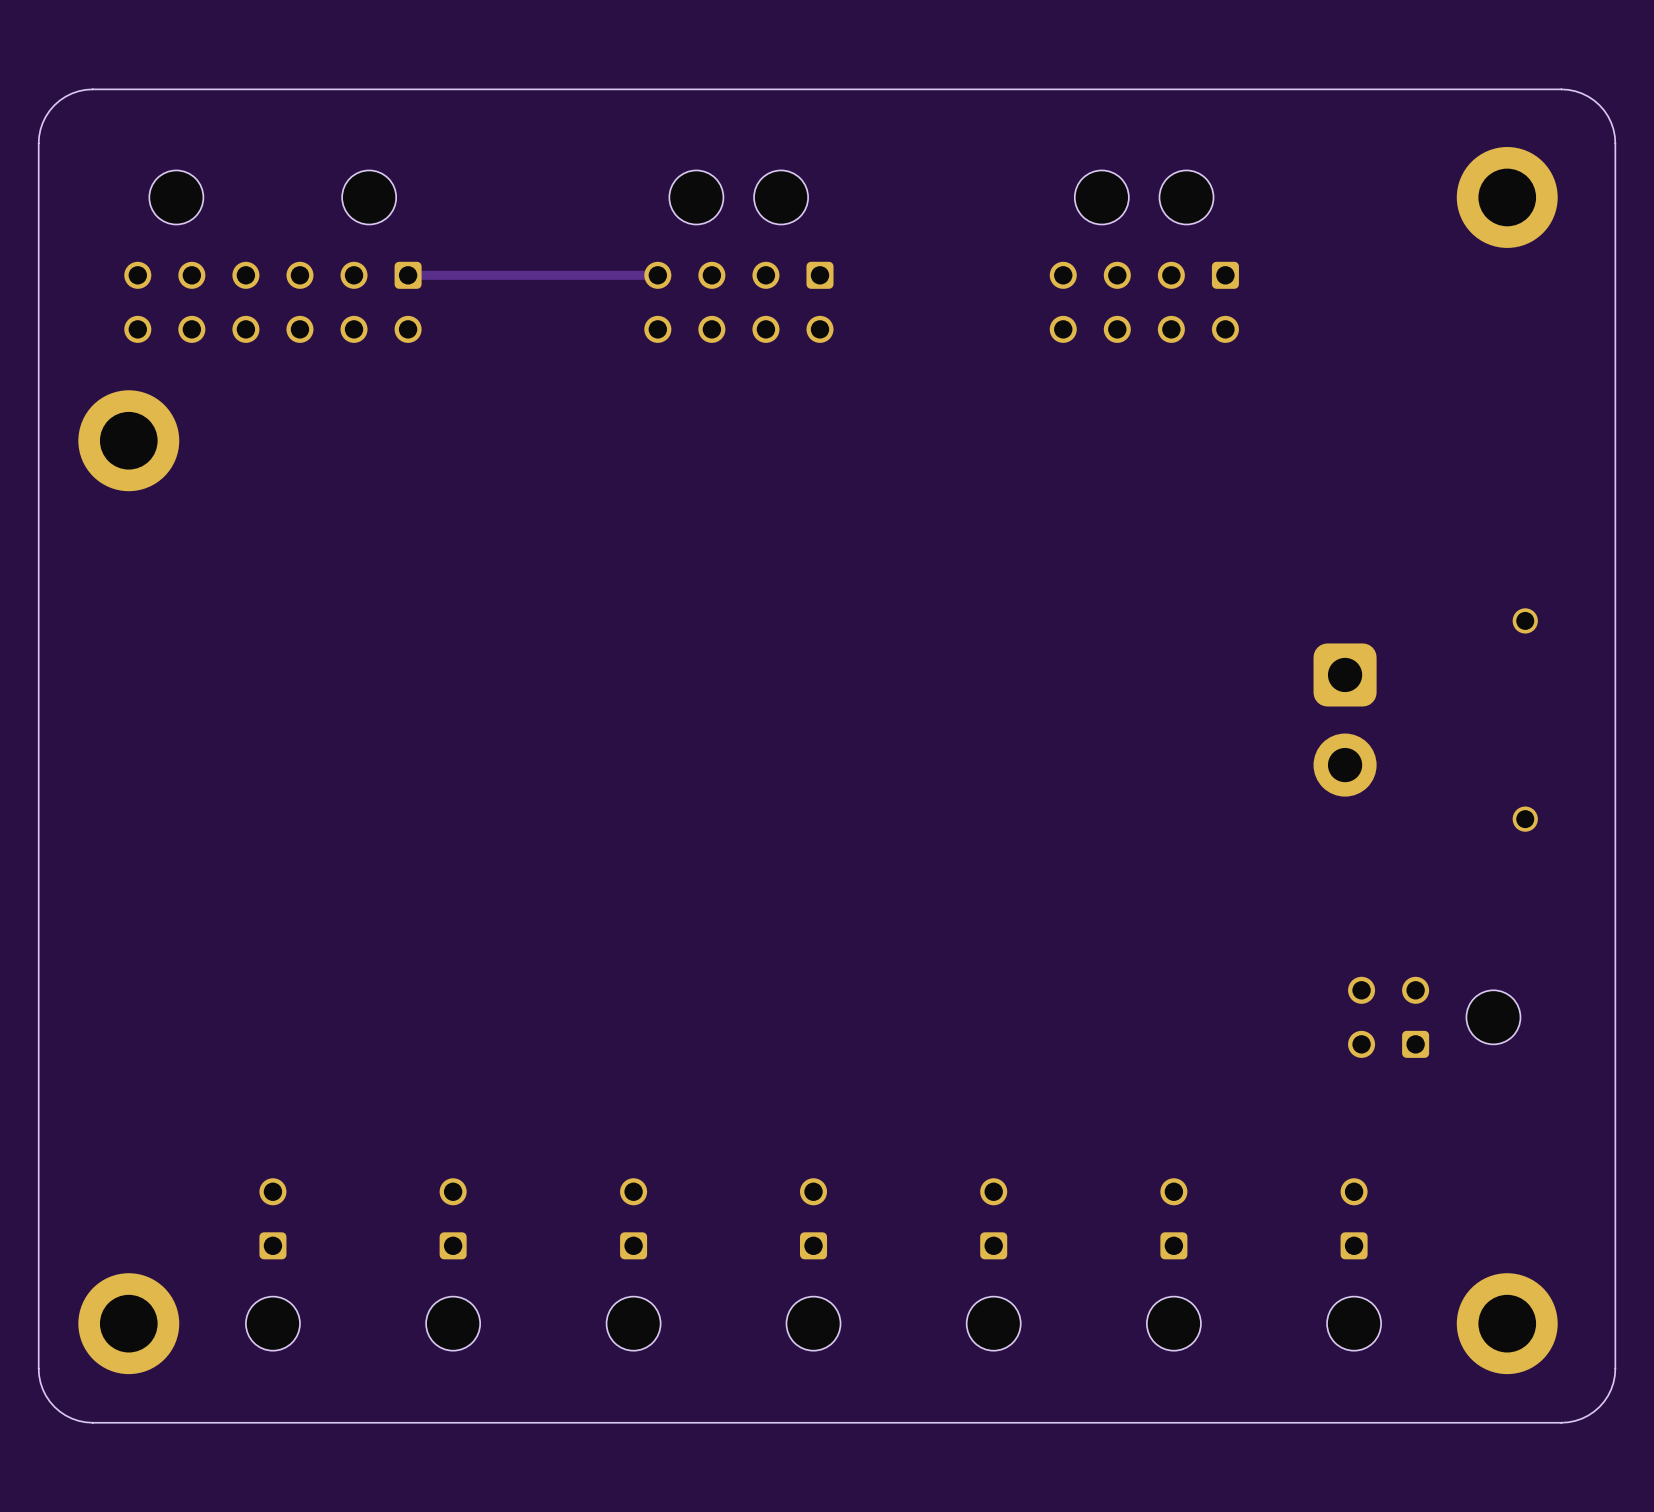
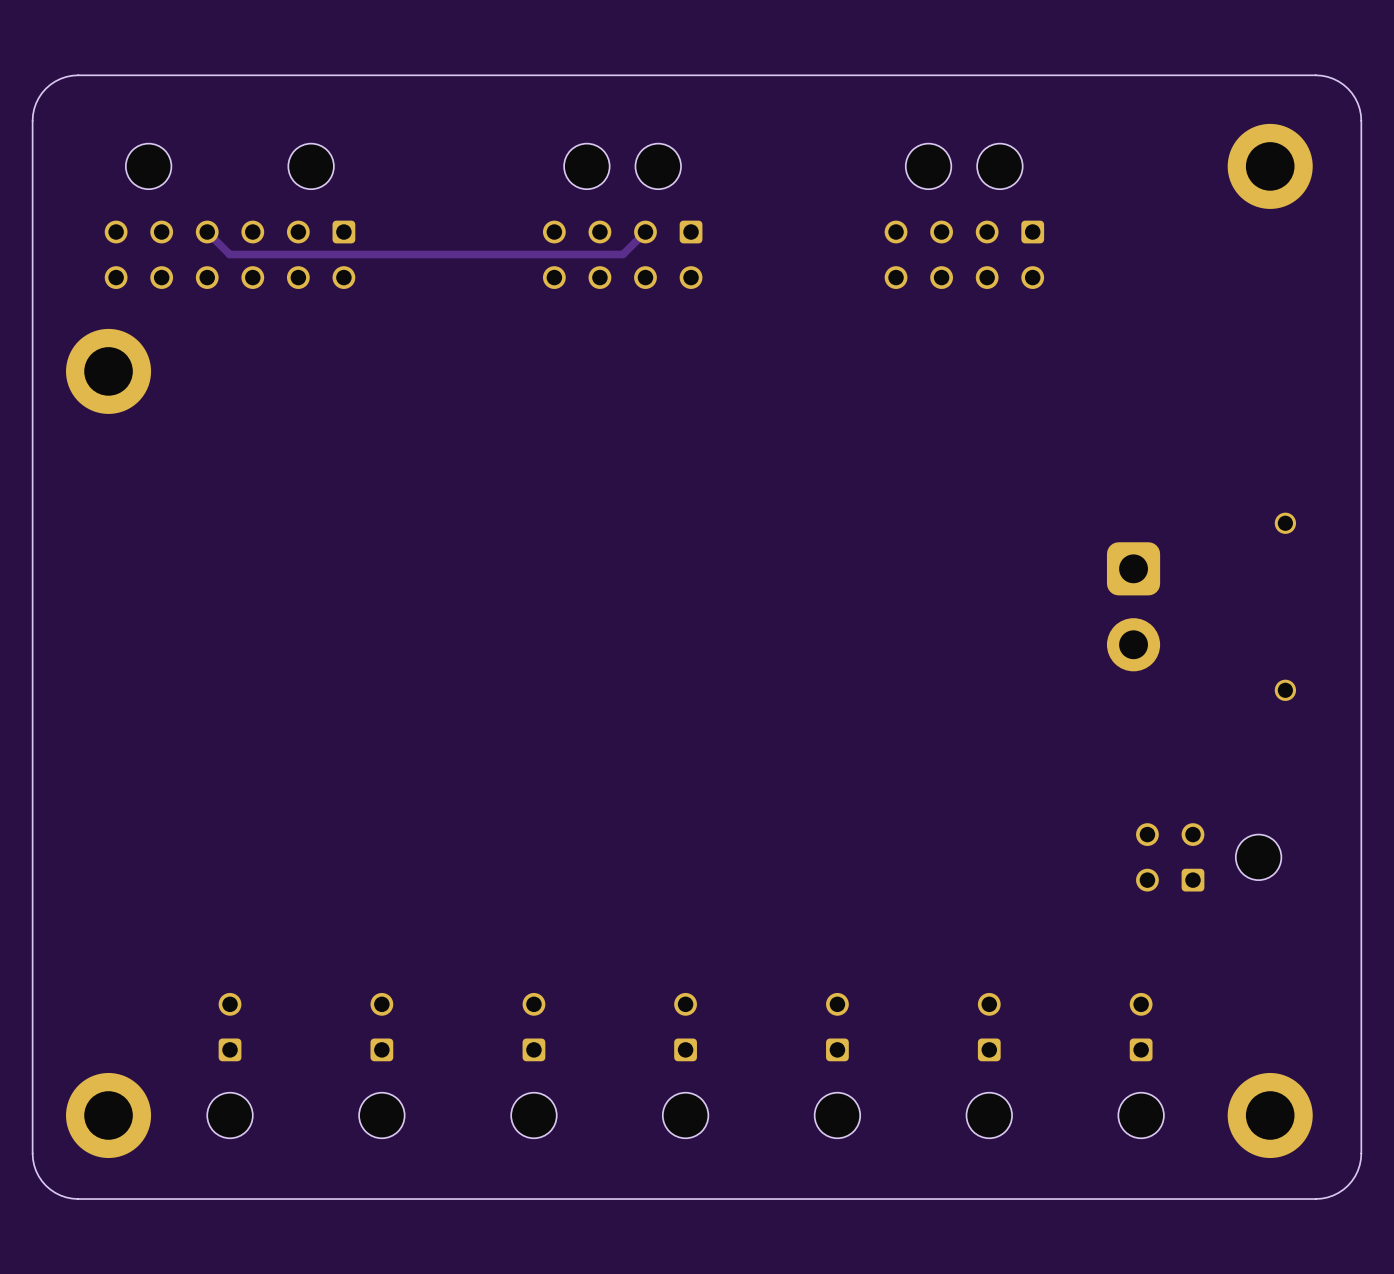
track: (657, 275) (408, 275) -> none
track: none -> (645, 232) (623, 254) (229, 254) (207, 232)

